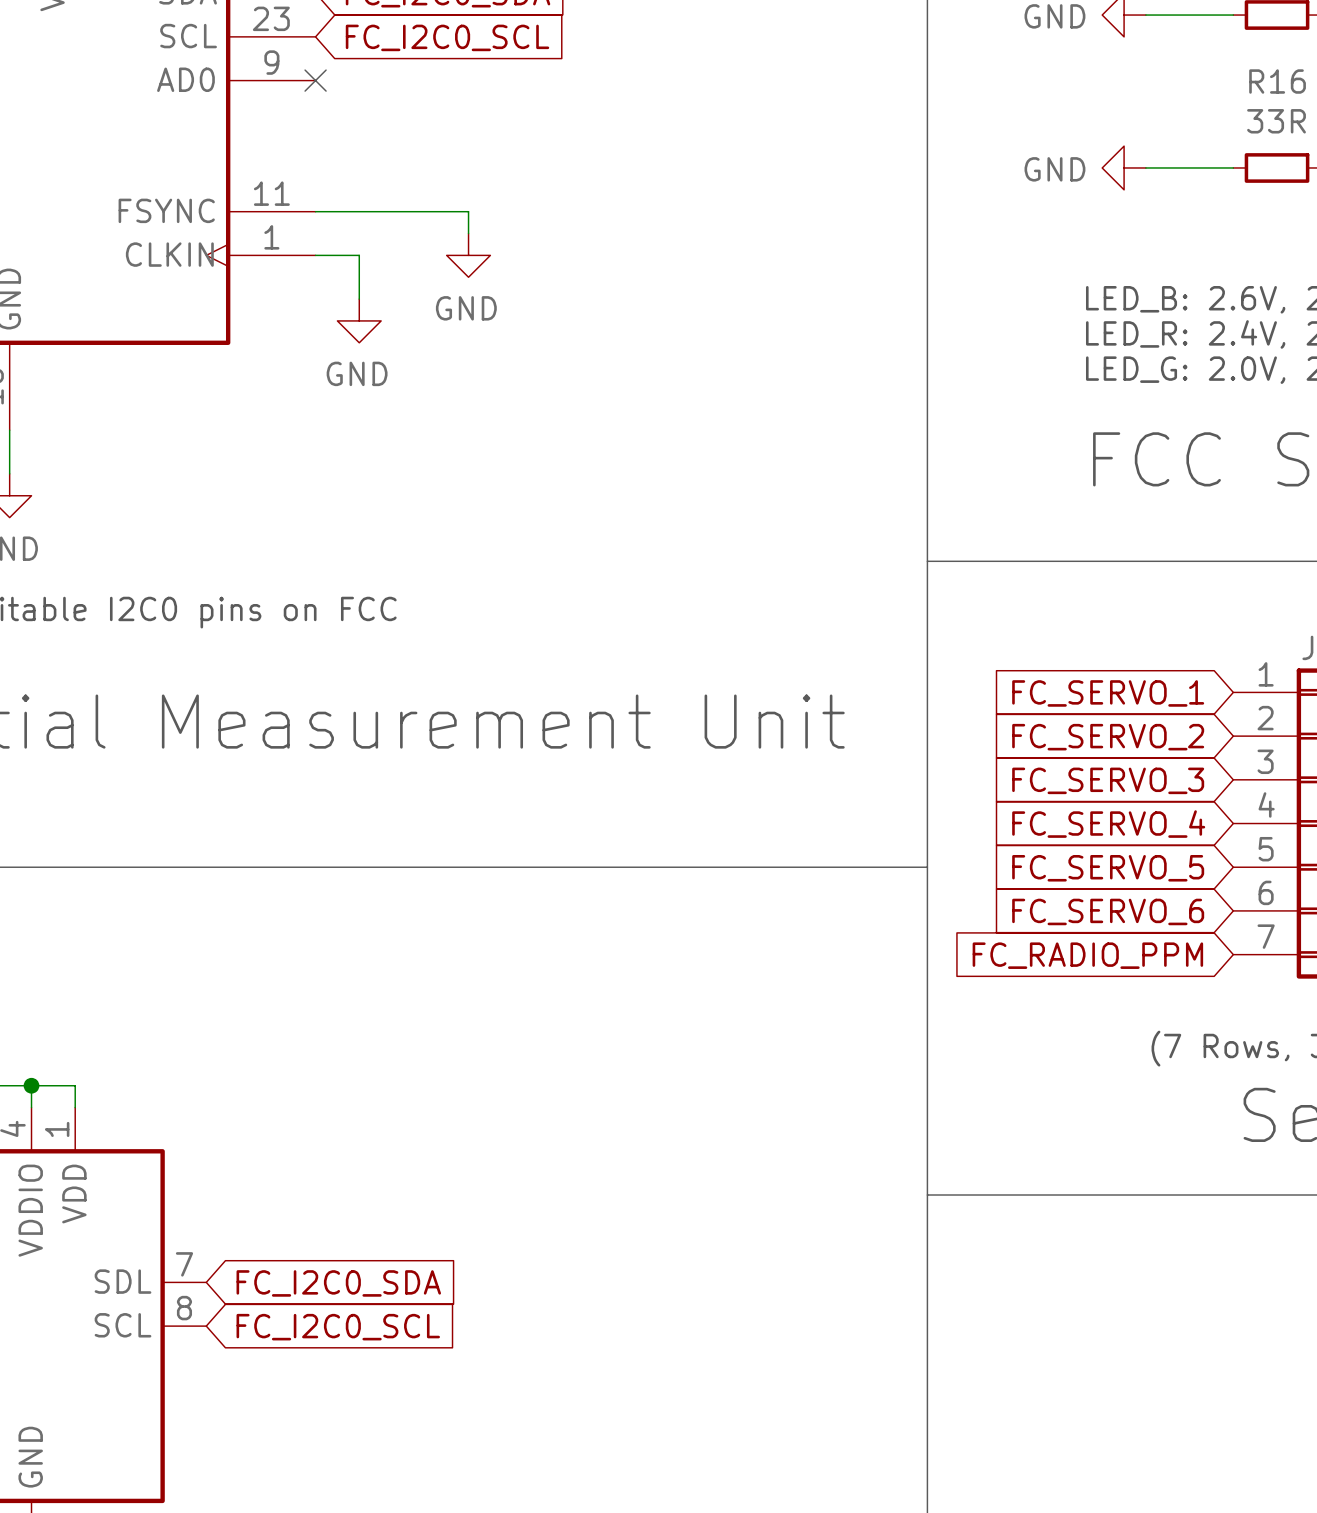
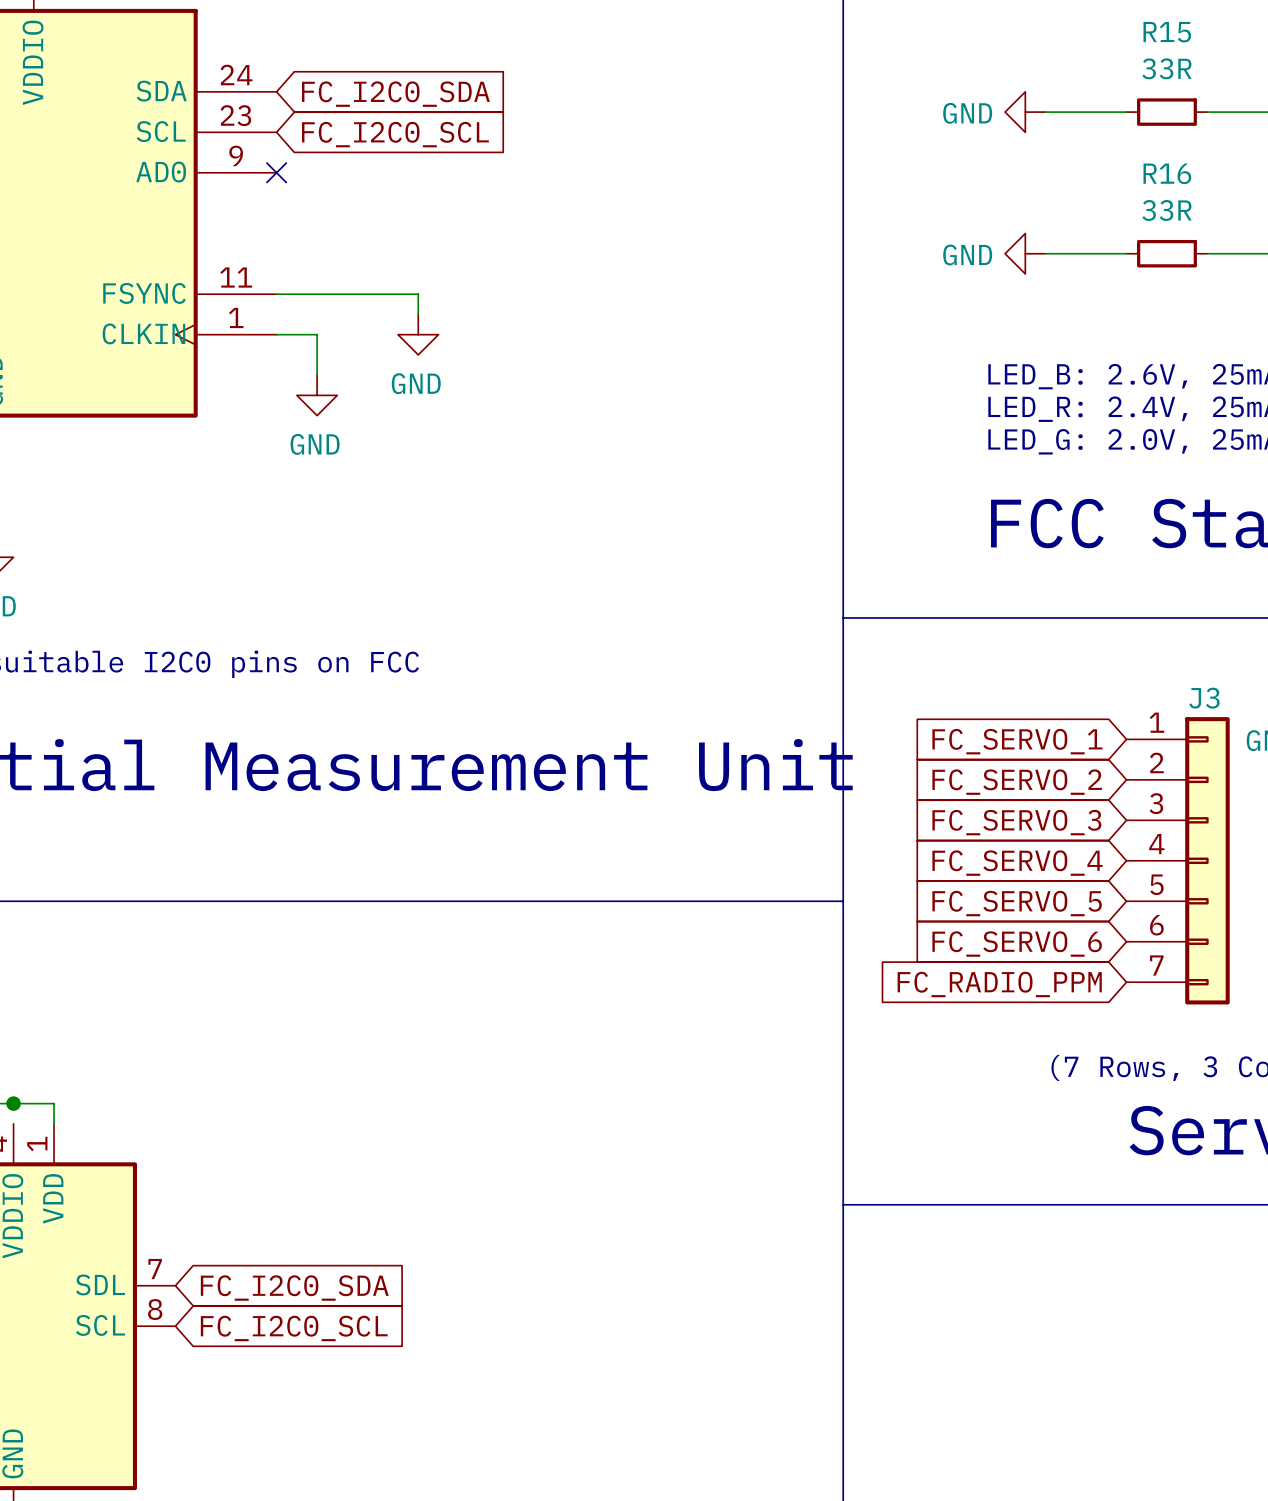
wire: (31, 1085) (31, 1107) -> none

